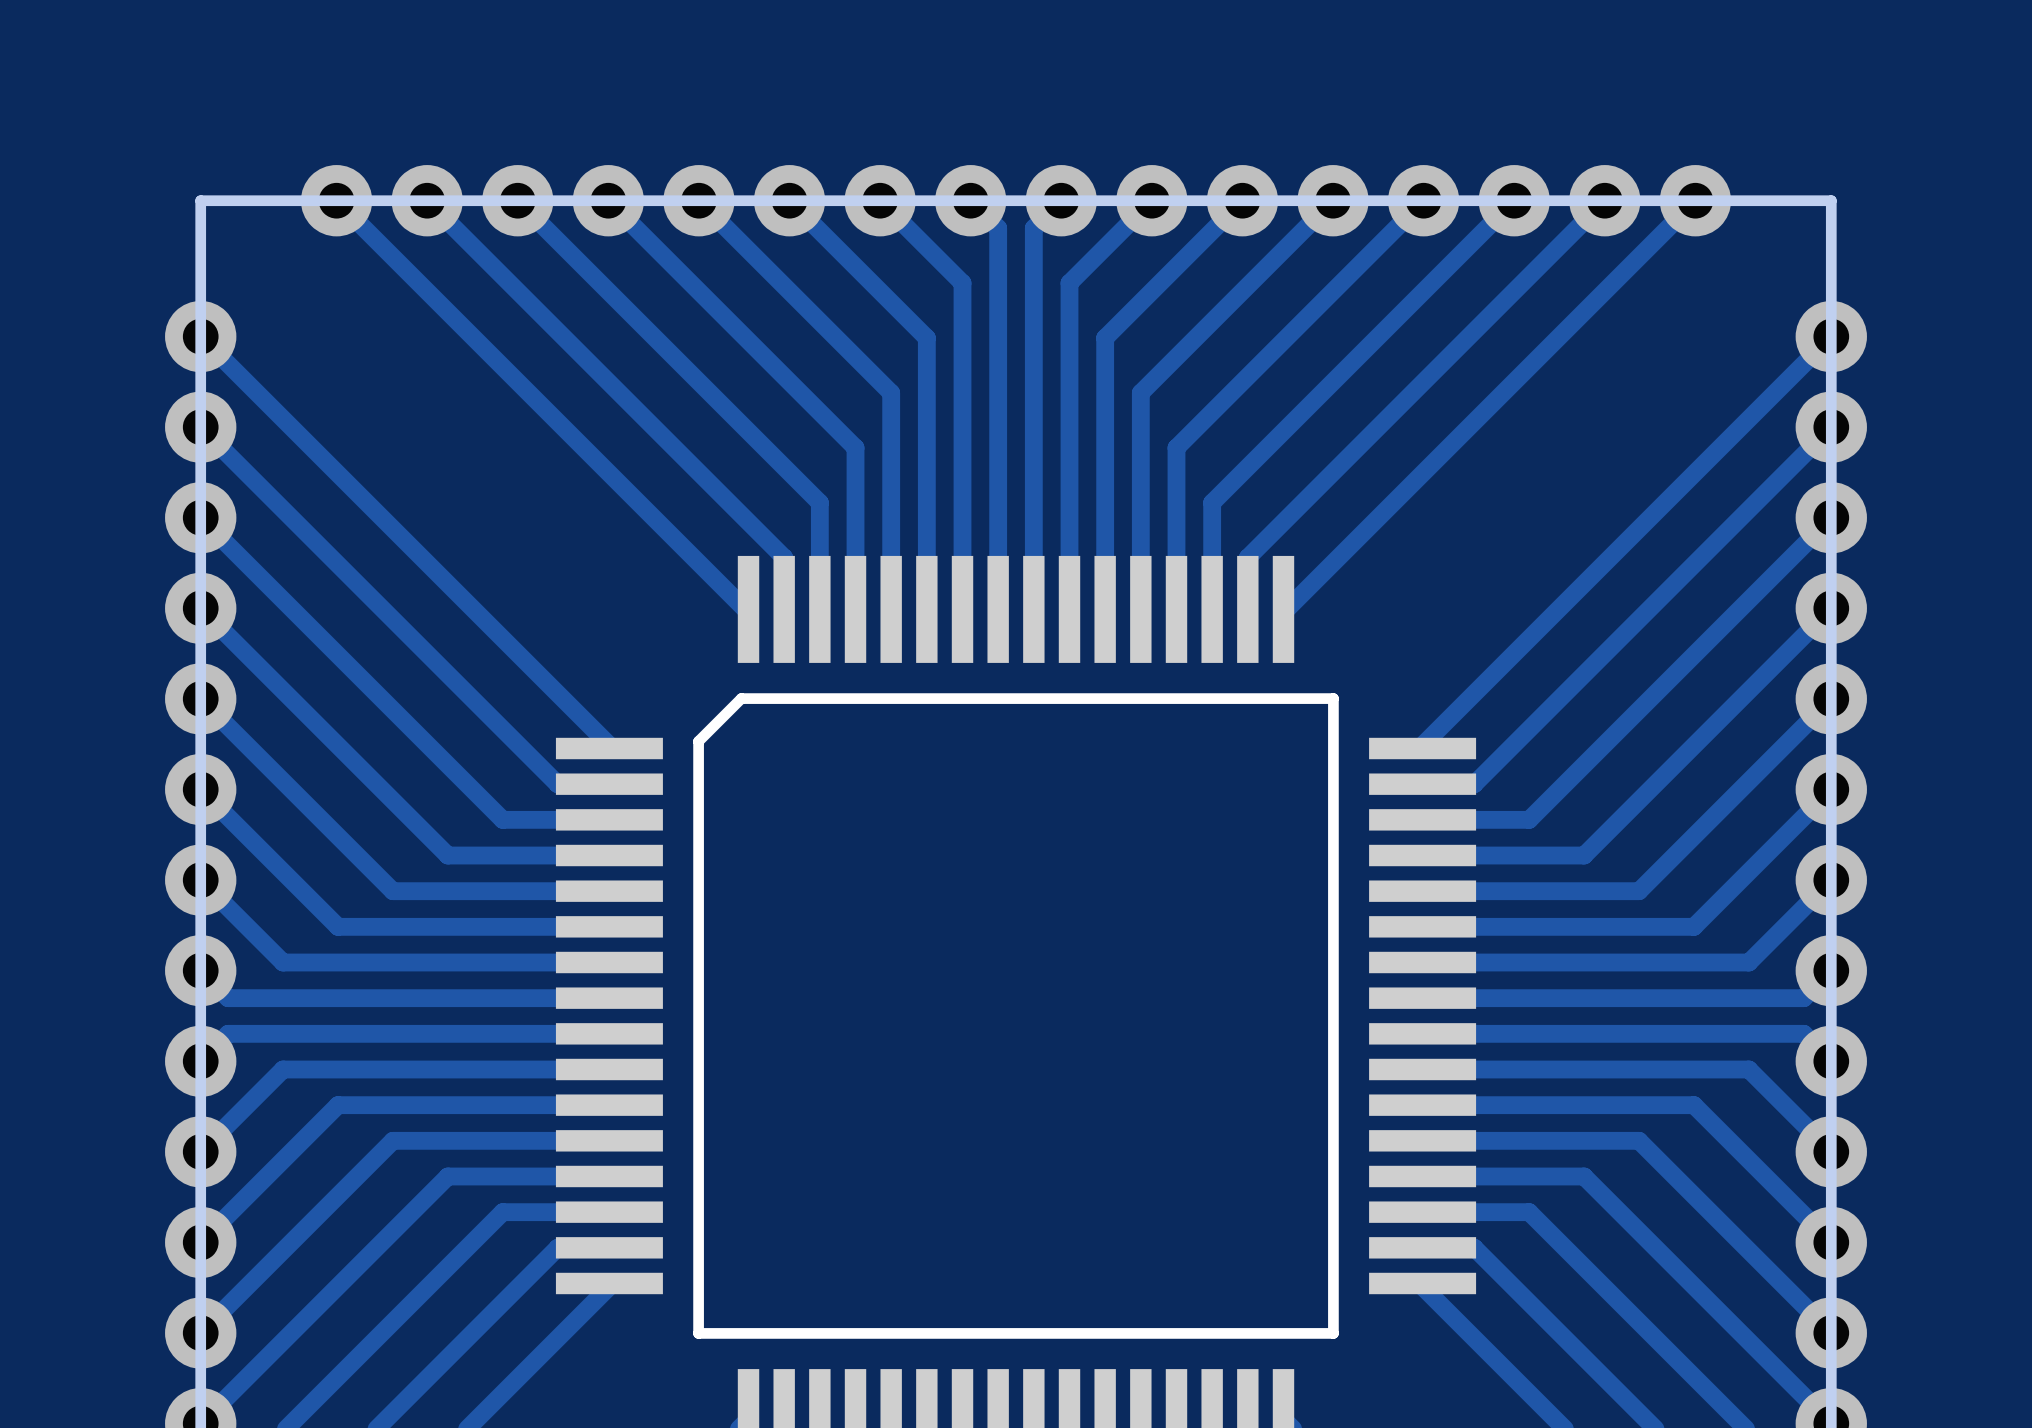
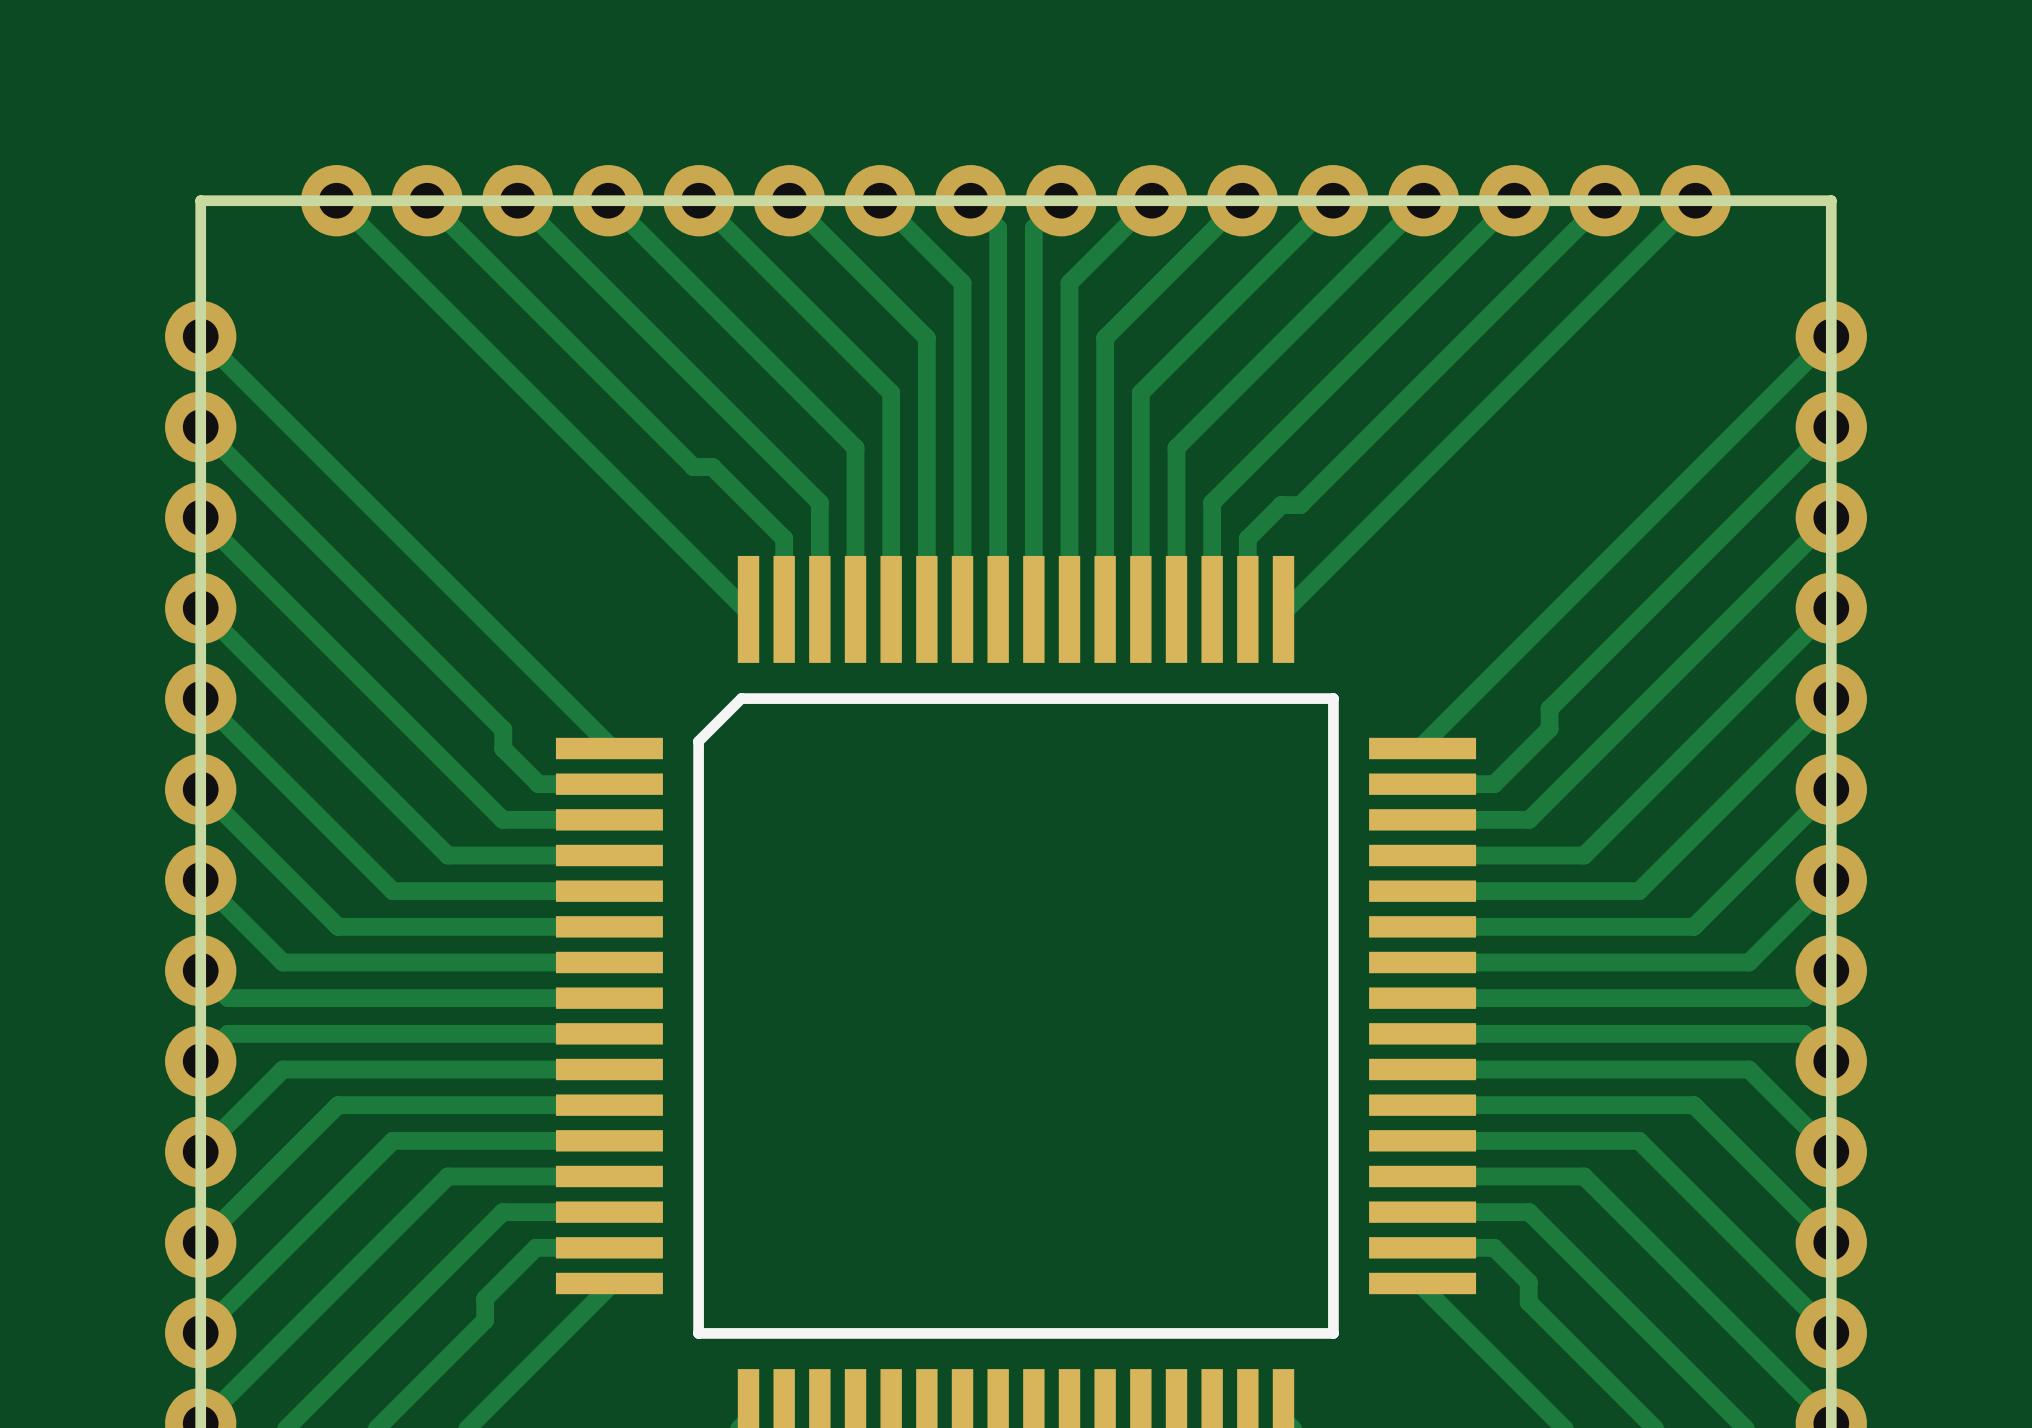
track: (693, 467) (784, 557) -> (693, 467) (712, 467) (784, 538) (784, 557)
track: (1300, 505) (1247, 557) -> (1300, 505) (1281, 505) (1247, 538) (1247, 557)
track: (1549, 708) (1474, 784) -> (1549, 708) (1549, 728) (1494, 784) (1474, 784)
track: (503, 729) (557, 784) -> (503, 729) (503, 748) (538, 784) (557, 784)
track: (557, 1247) (485, 1320) -> (557, 1247) (535, 1247) (485, 1298) (485, 1320)
track: (1474, 1247) (1528, 1302) -> (1474, 1247) (1494, 1247) (1528, 1282) (1528, 1302)

